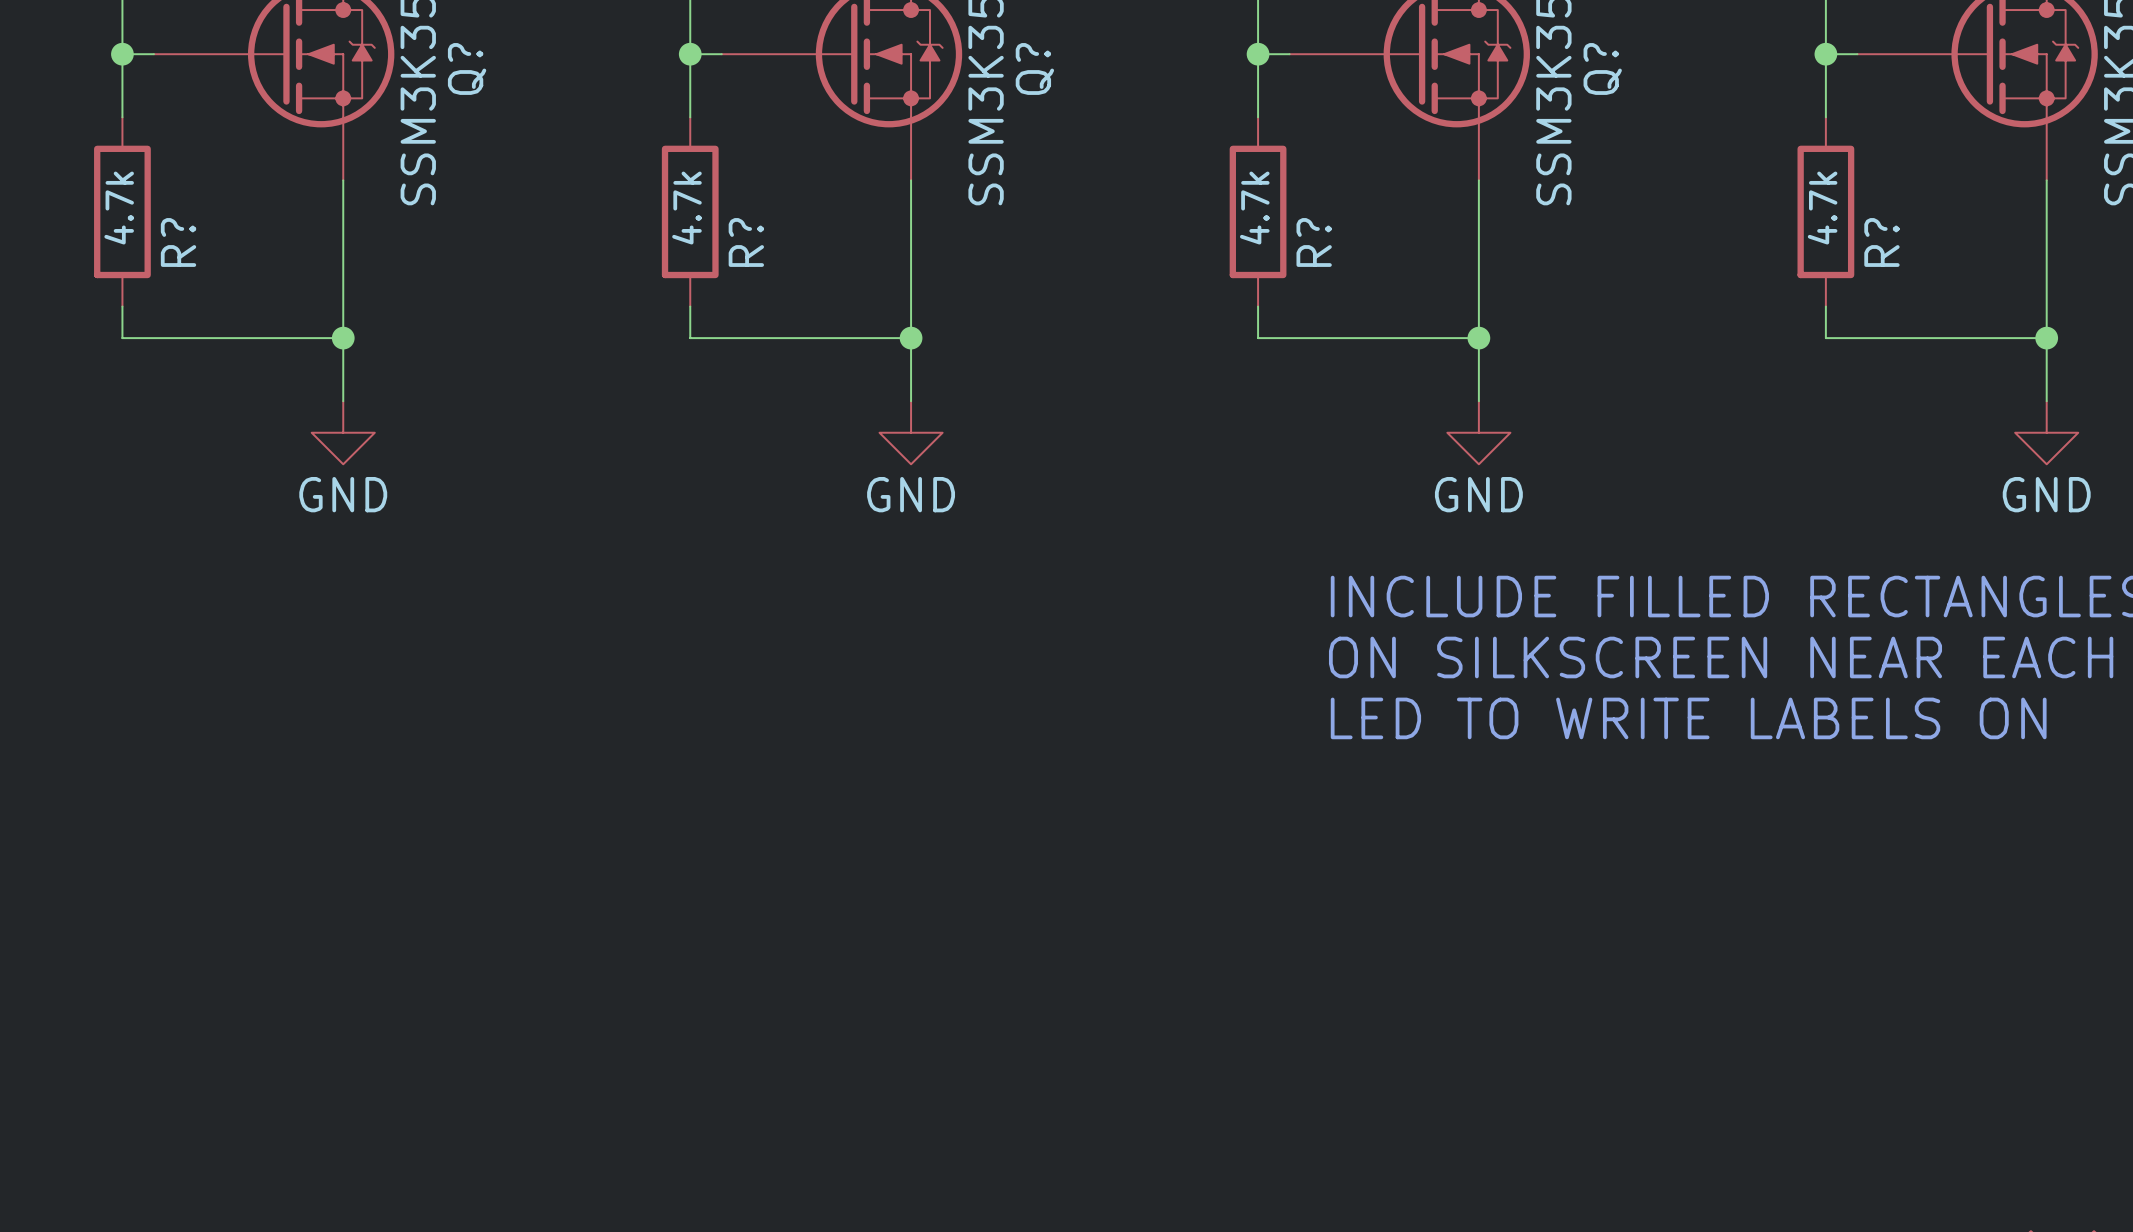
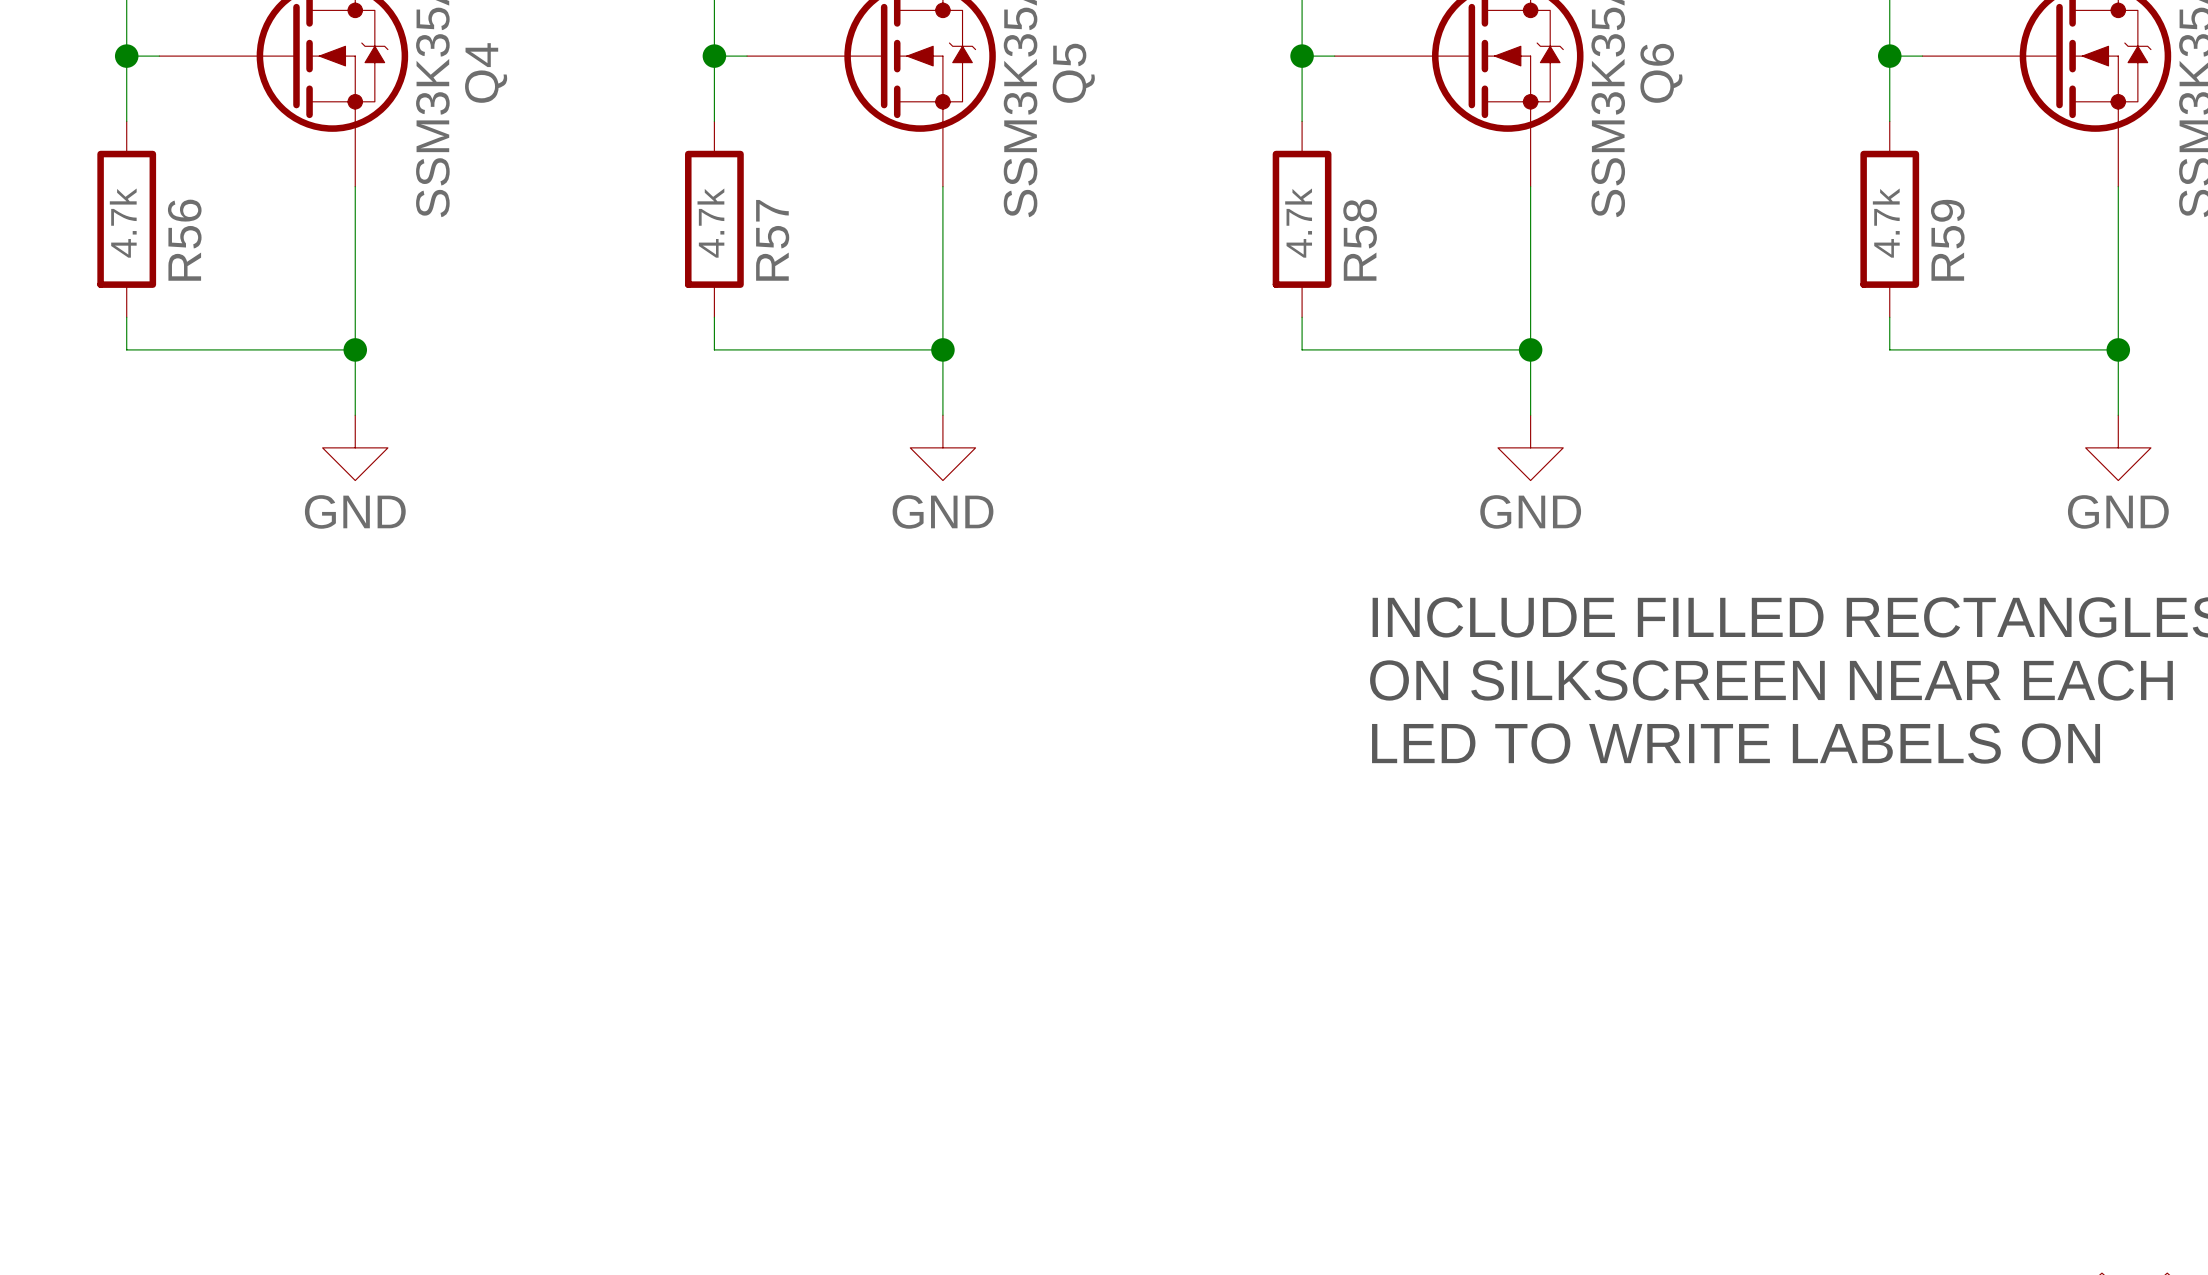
Q? name: Q? (467, 68) -> Q4 (486, 72)
Q? name: Q? (1034, 68) -> Q5 (1073, 73)
Q? name: Q? (1602, 68) -> Q6 (1661, 73)
R? name: R? (178, 242) -> R56 (184, 240)
R? name: R? (746, 242) -> R57 (772, 240)
R? name: R? (1314, 242) -> R58 (1360, 240)
R? name: R? (1881, 242) -> R59 (1947, 240)

